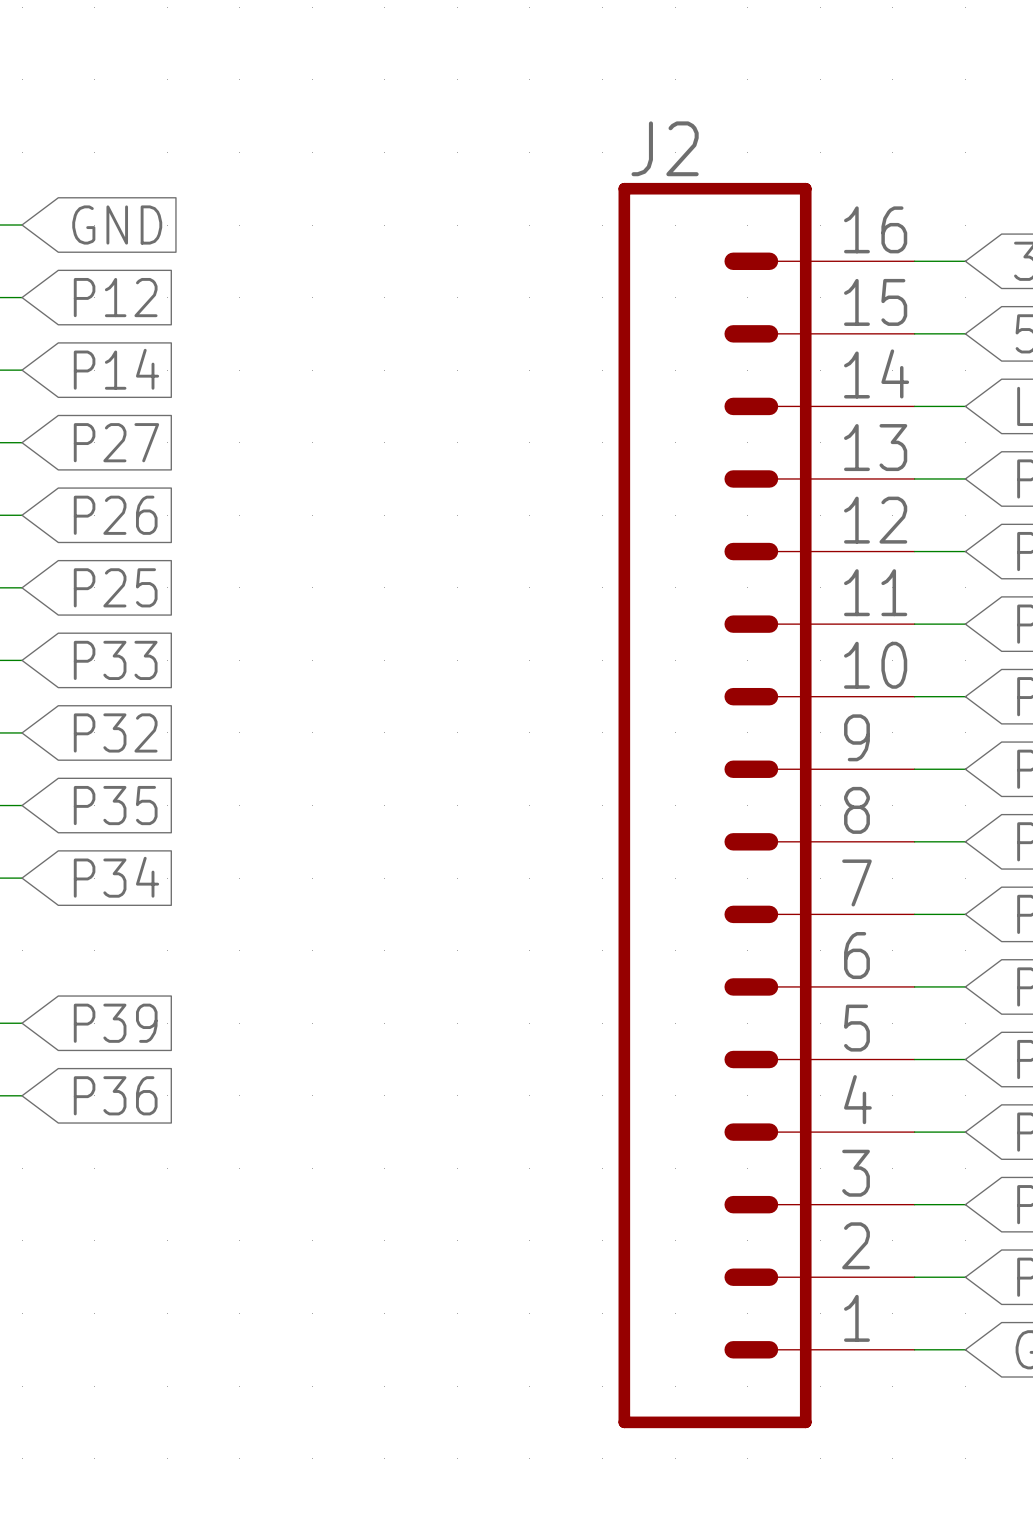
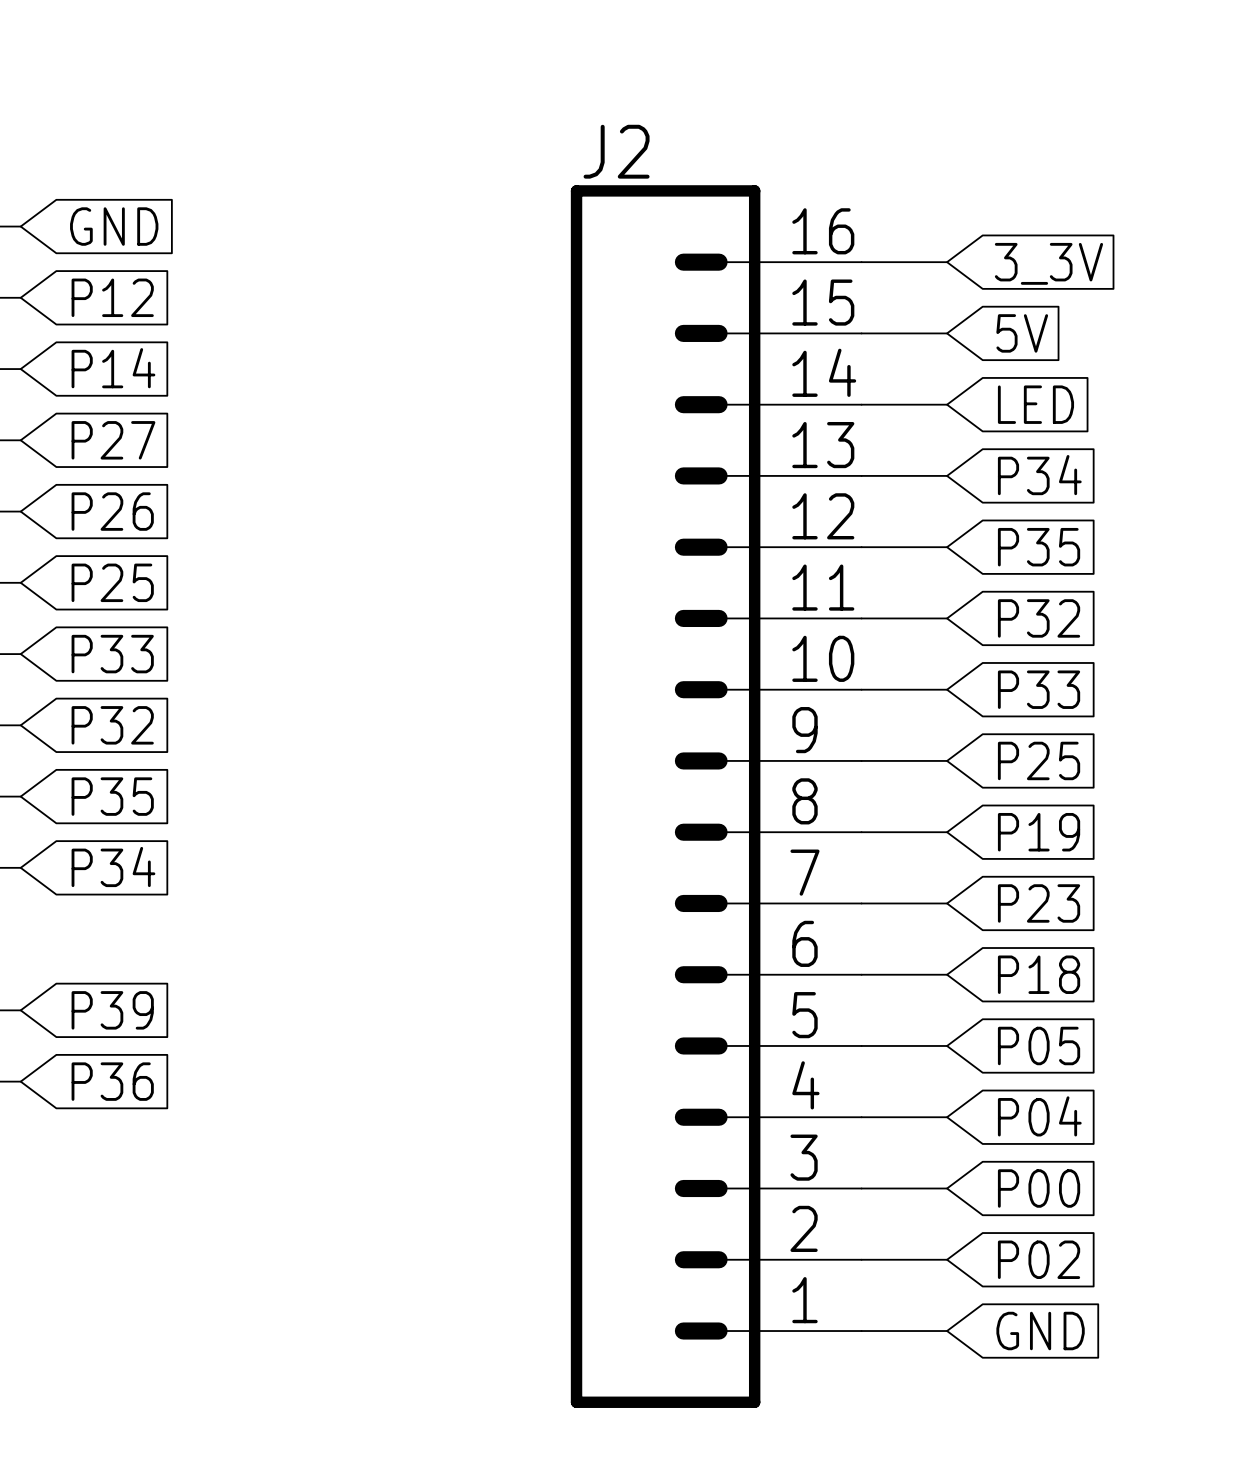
J2 position: (766, 805) -> (716, 796)

